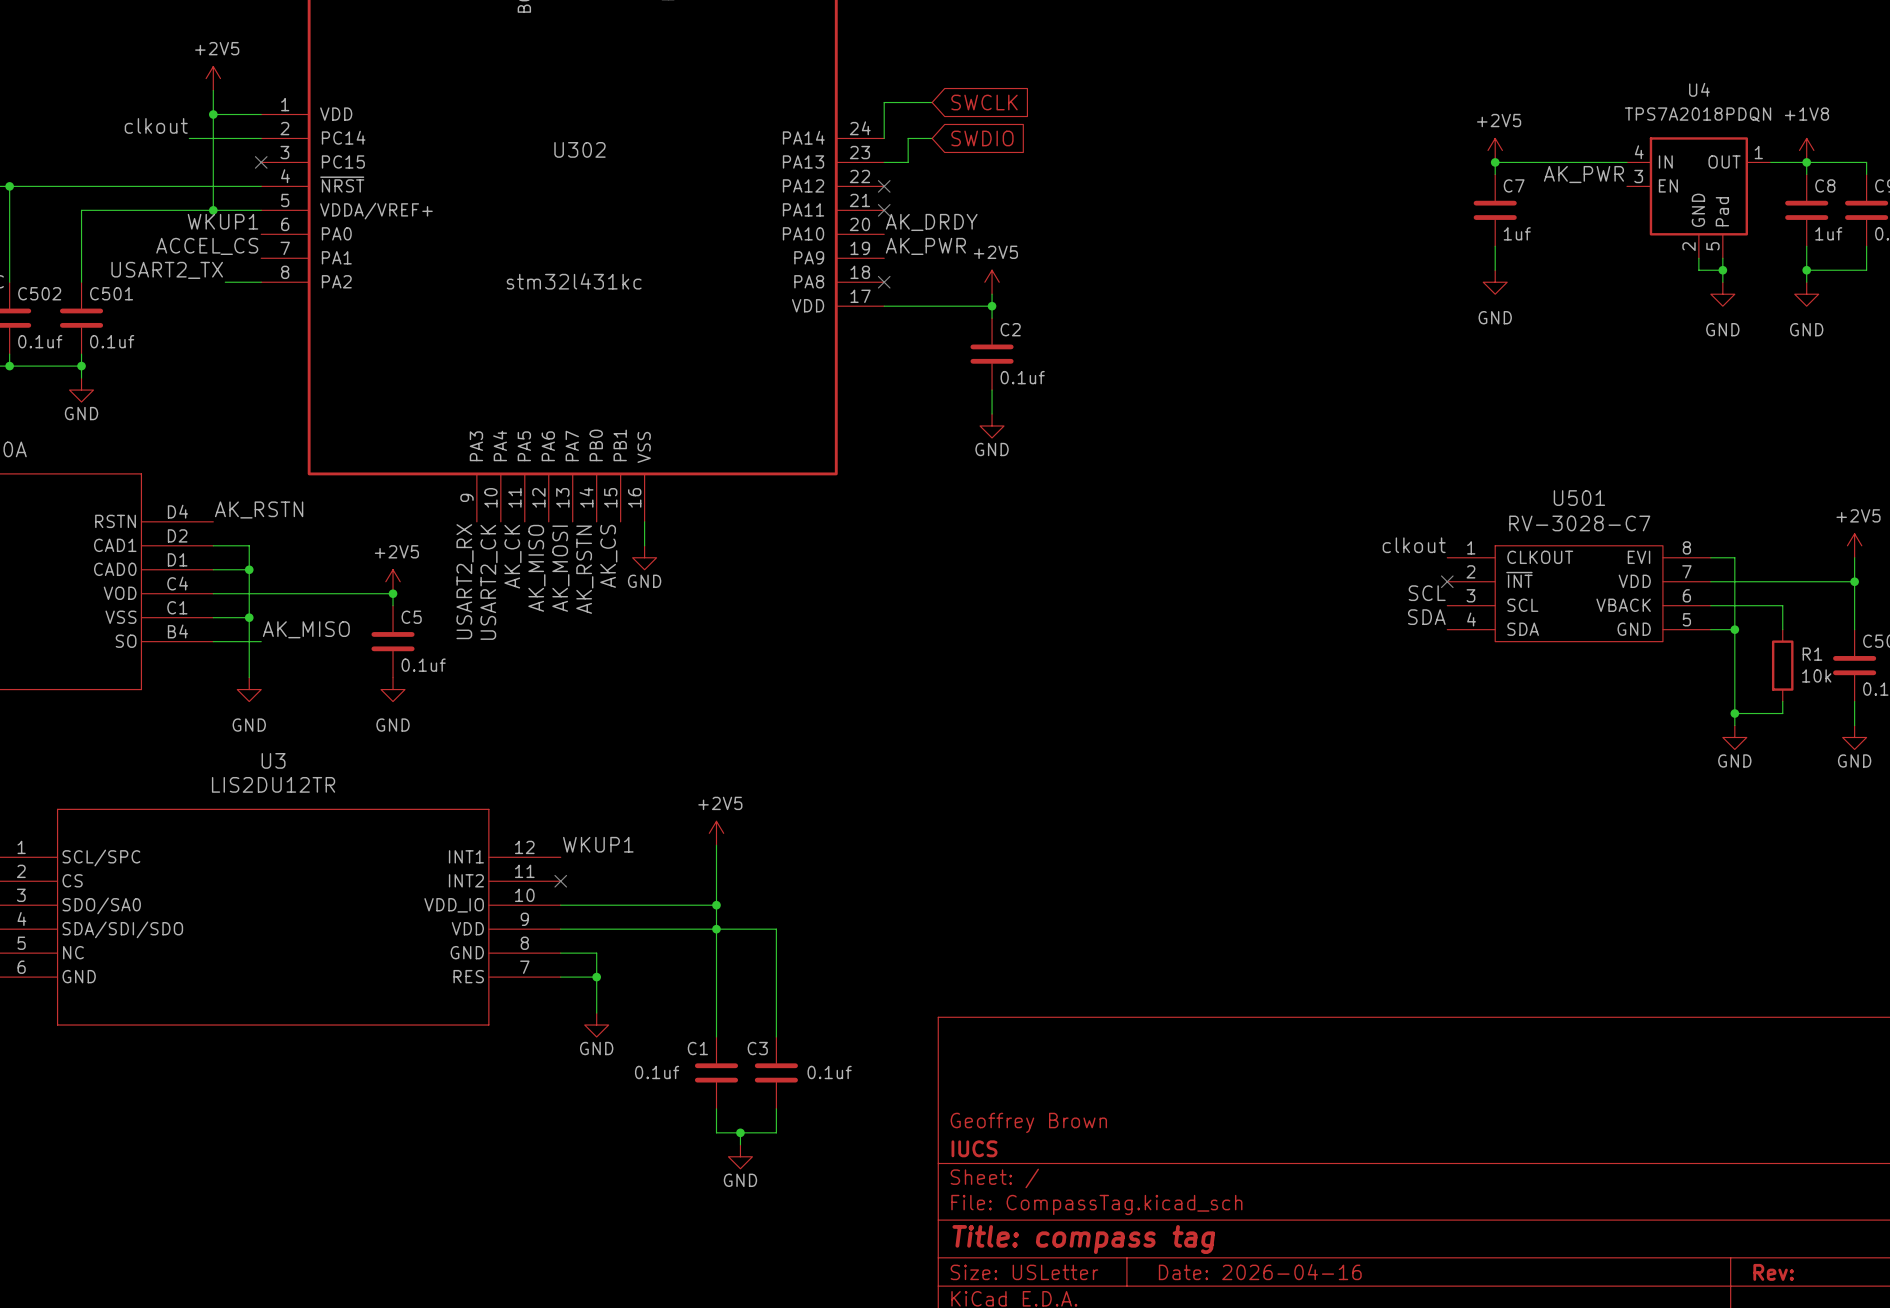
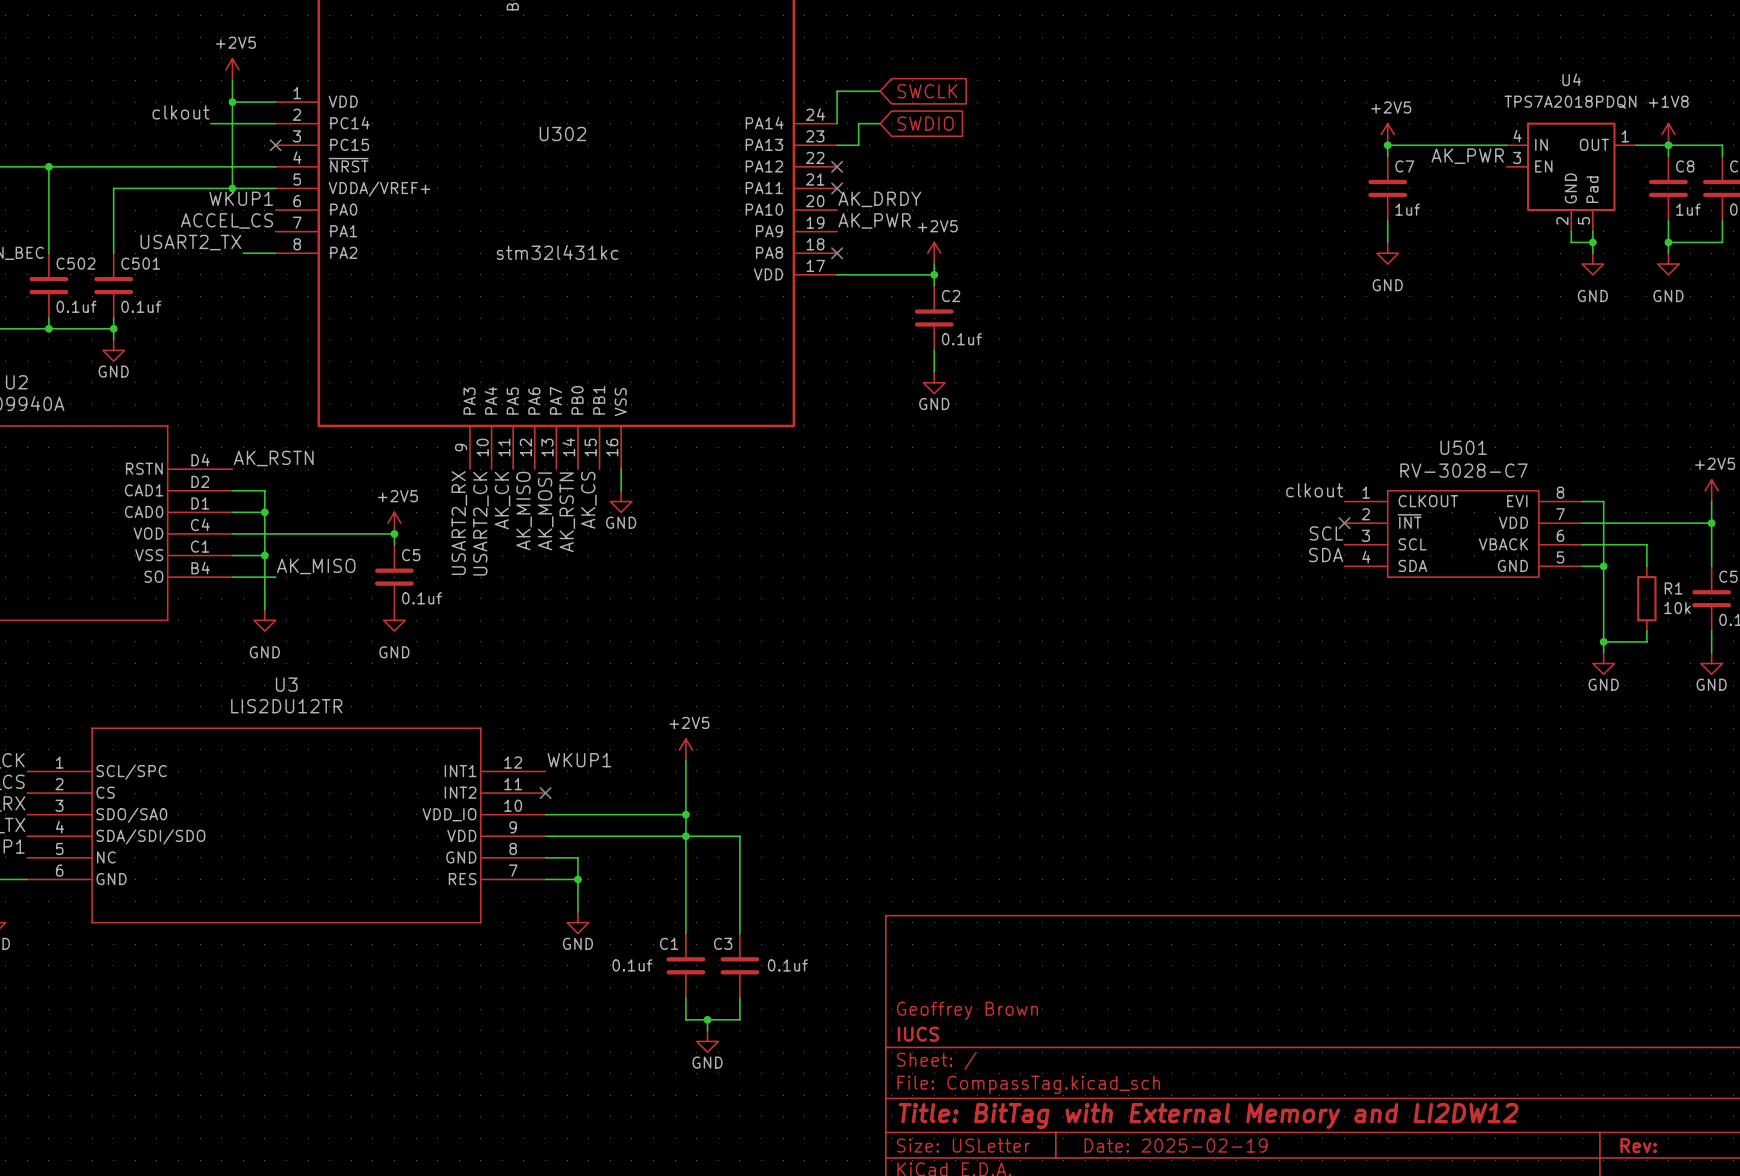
title block: Title: compass tag (1083, 1239) -> Title: BitTag with External Memory and LI2DW12 (1208, 1115)
title block: Date: 2026-04-16 (1260, 1272) -> Date: 2025-02-19 (1176, 1145)

